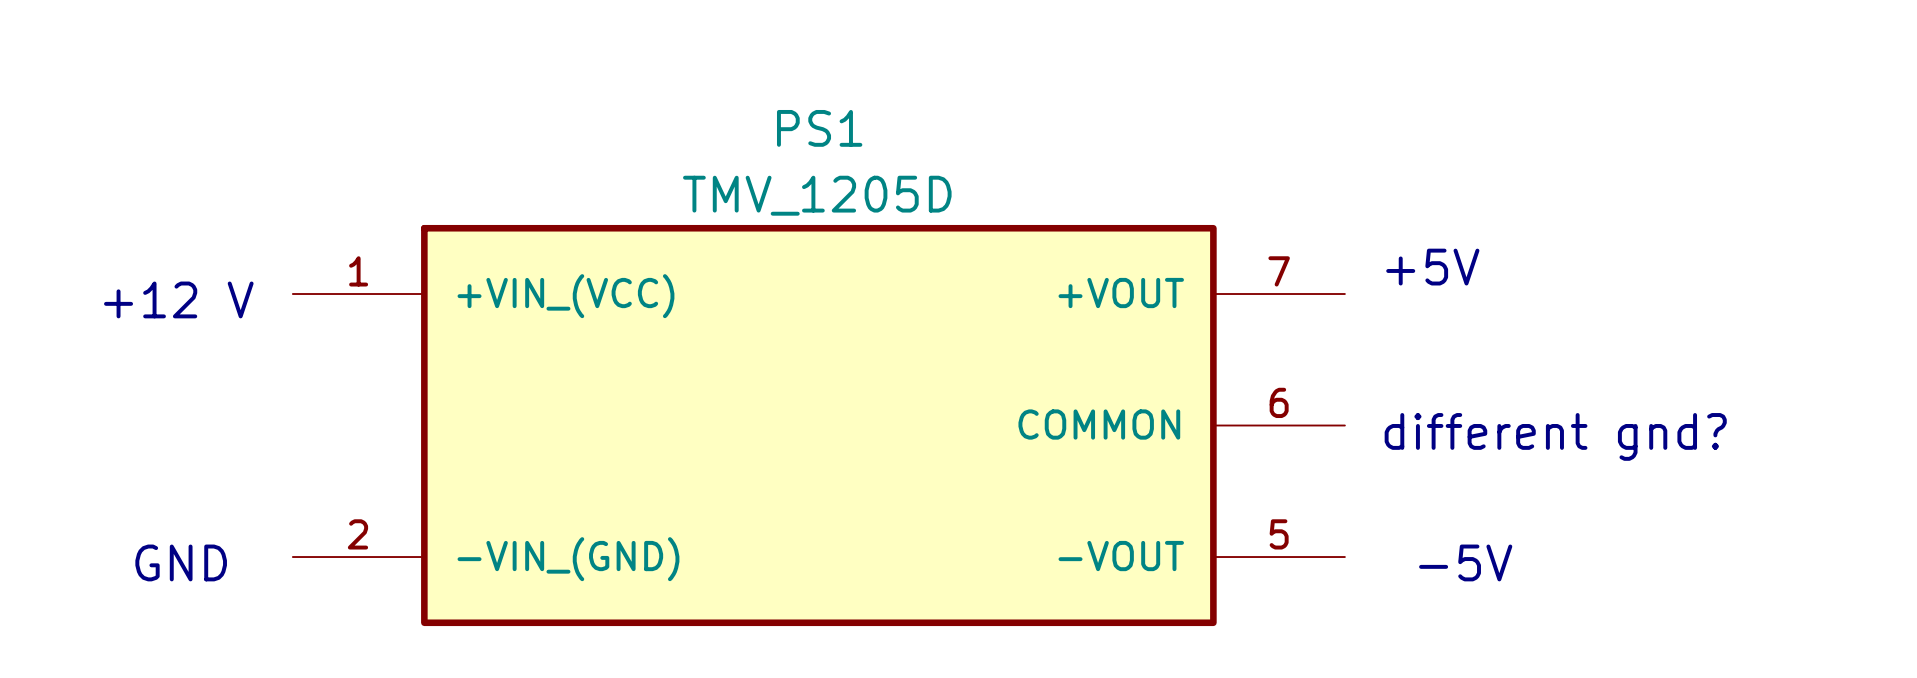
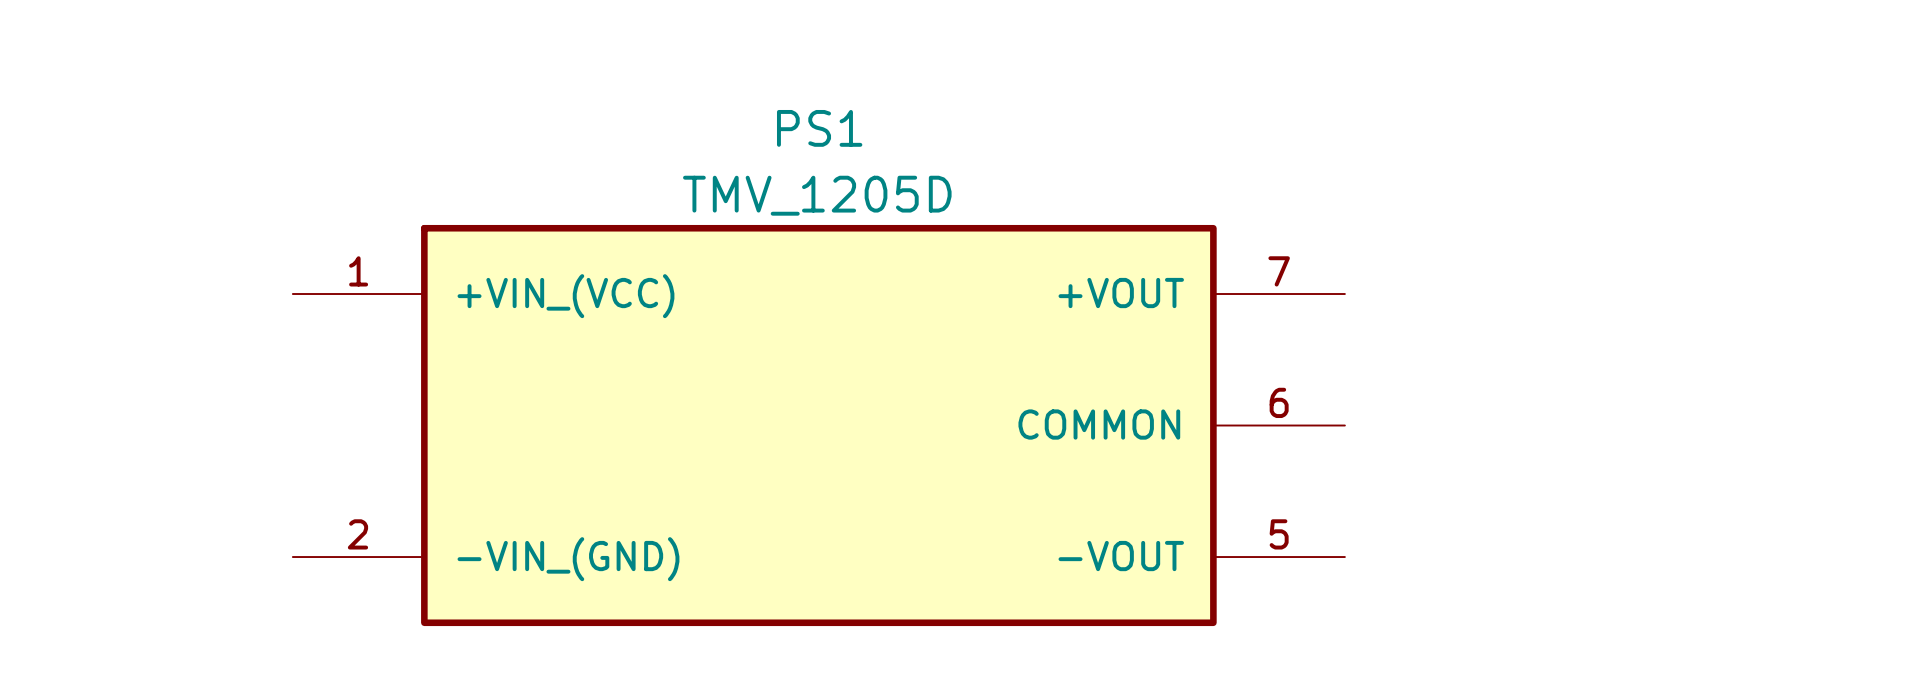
text: +5V (1432, 267) -> none
text: +12 V (178, 299) -> none
text: different gnd? (1555, 436) -> none
text: GND (181, 562) -> none
text: -5V (1465, 562) -> none

